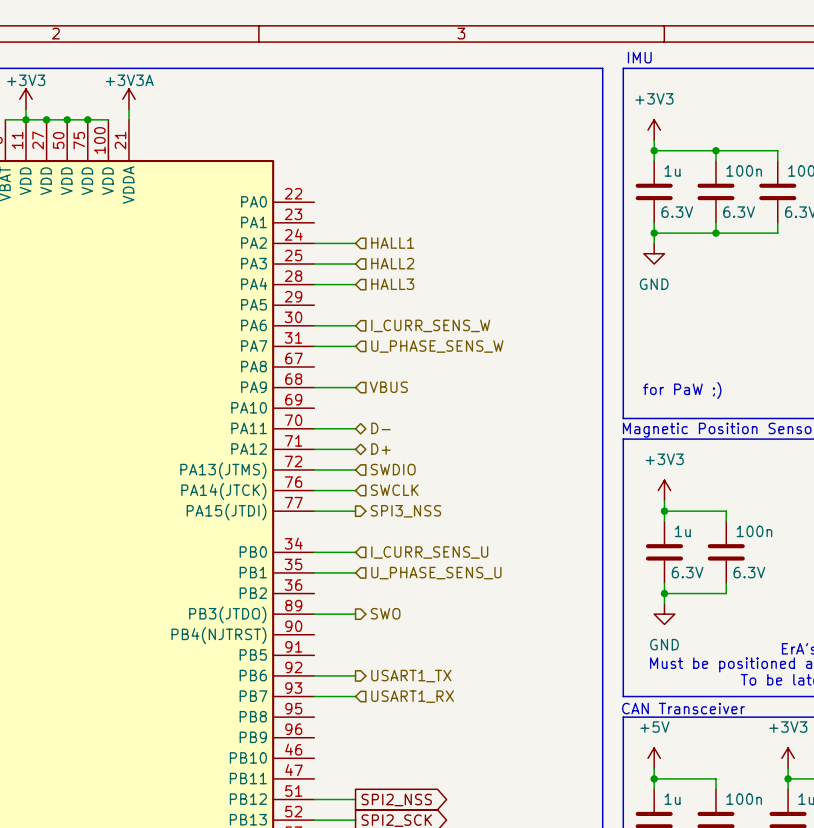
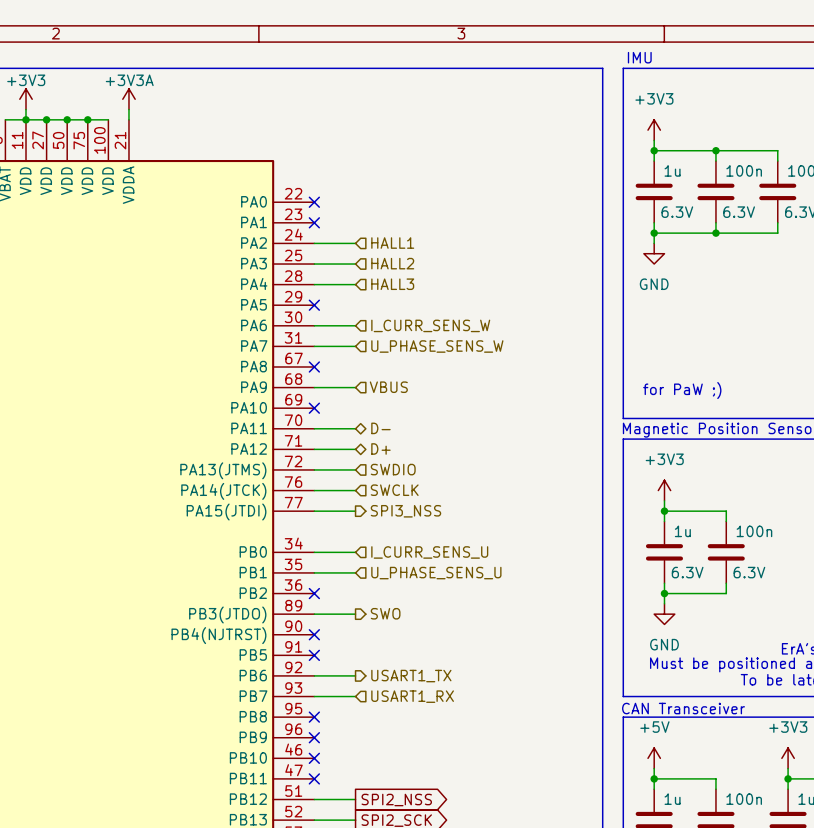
no-connect mark: none -> (314, 202)
no-connect mark: none -> (314, 222)
no-connect mark: none -> (314, 305)
no-connect mark: none -> (314, 366)
no-connect mark: none -> (314, 408)
no-connect mark: none -> (314, 593)
no-connect mark: none -> (314, 634)
no-connect mark: none -> (314, 655)
no-connect mark: none -> (314, 717)
no-connect mark: none -> (314, 737)
no-connect mark: none -> (314, 758)
no-connect mark: none -> (314, 778)

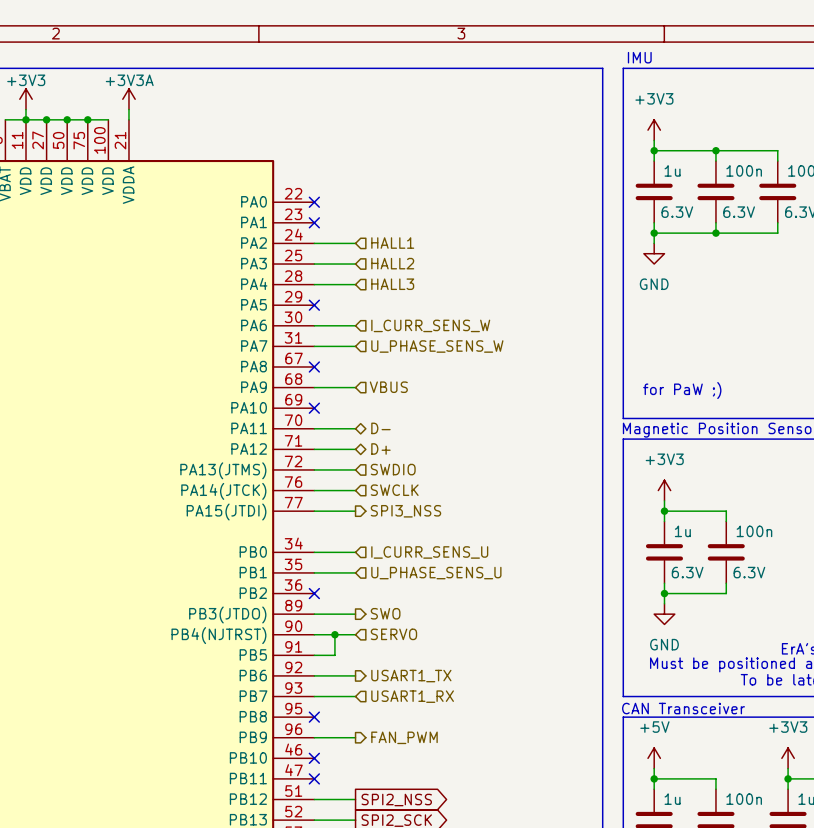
wire: none -> (314, 634) (355, 634)
no-connect mark: (314, 634) -> none
wire: none -> (334, 634) (334, 655) (314, 655)
junction: none -> (334, 634)
hierarchical label: none -> SERVO (393, 634)
no-connect mark: (314, 655) -> none
wire: none -> (314, 737) (355, 737)
no-connect mark: (314, 737) -> none
hierarchical label: none -> FAN_PWM (404, 737)

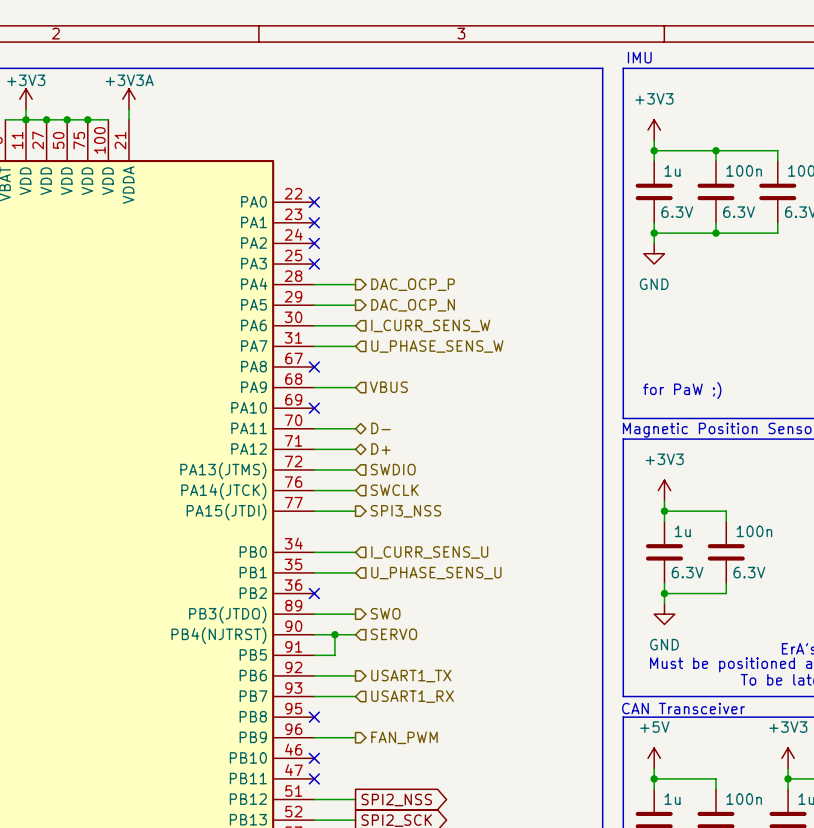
wire: (314, 243) (355, 243) -> none
no-connect mark: none -> (314, 243)
hierarchical label: HALL1 (392, 243) -> none
hierarchical label: HALL2 (392, 263) -> none
wire: (314, 264) (355, 264) -> (314, 305) (355, 305)
no-connect mark: none -> (314, 264)
hierarchical label shape: input (392, 284) -> output (413, 284)
hierarchical label: HALL3 (392, 284) -> DAC_OCP_P (413, 284)
no-connect mark: (314, 305) -> none
hierarchical label: none -> DAC_OCP_N (413, 305)

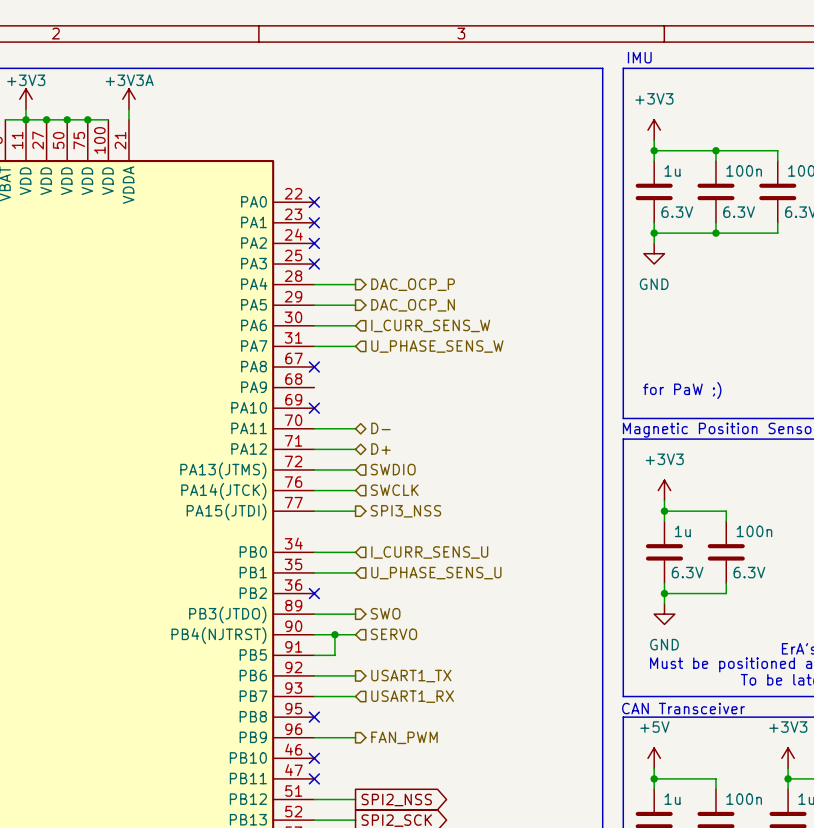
wire: (314, 387) (355, 387) -> none
hierarchical label: VBUS (388, 387) -> none

